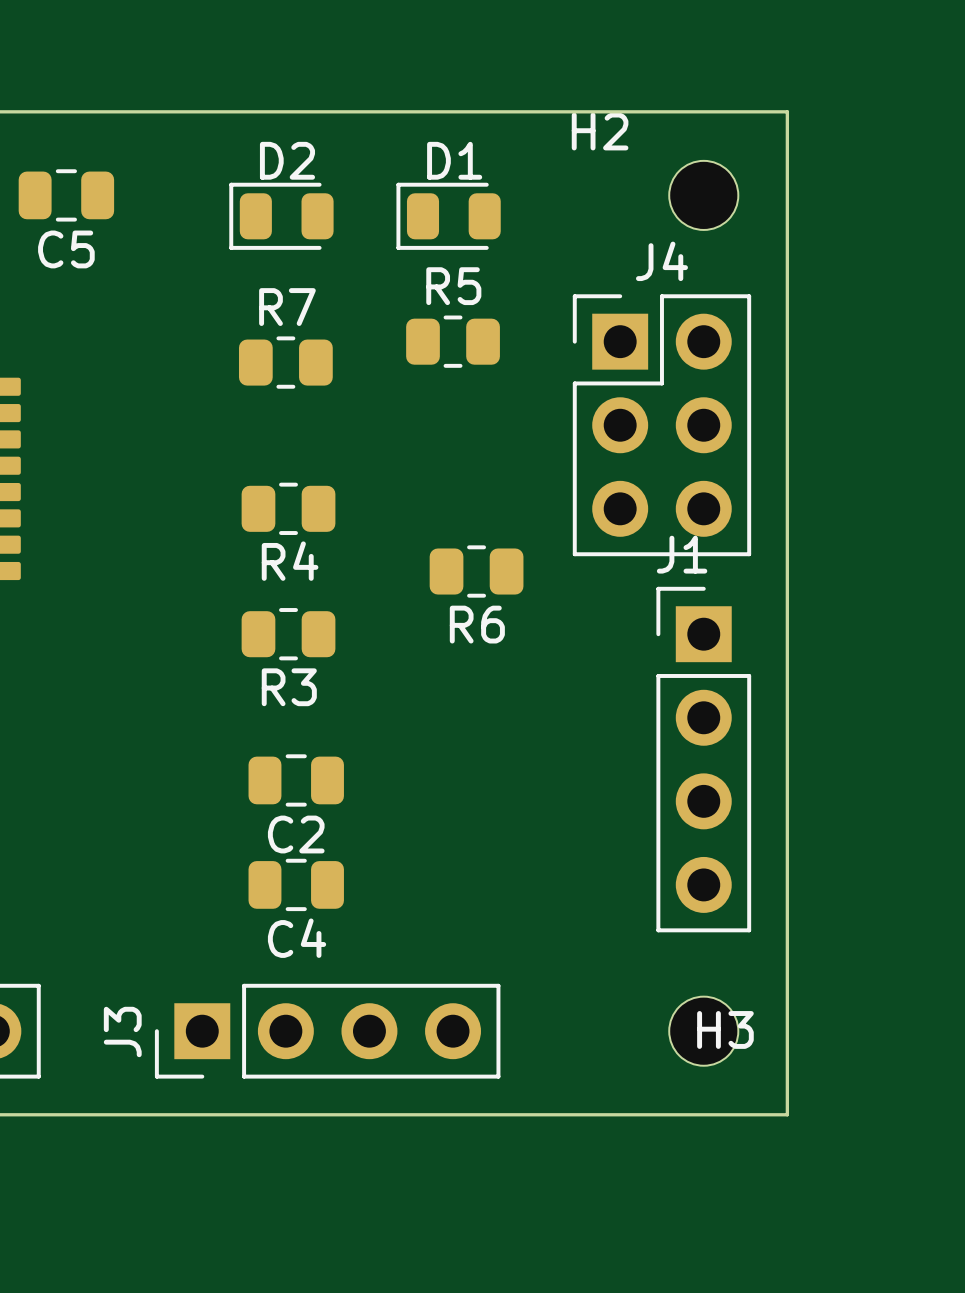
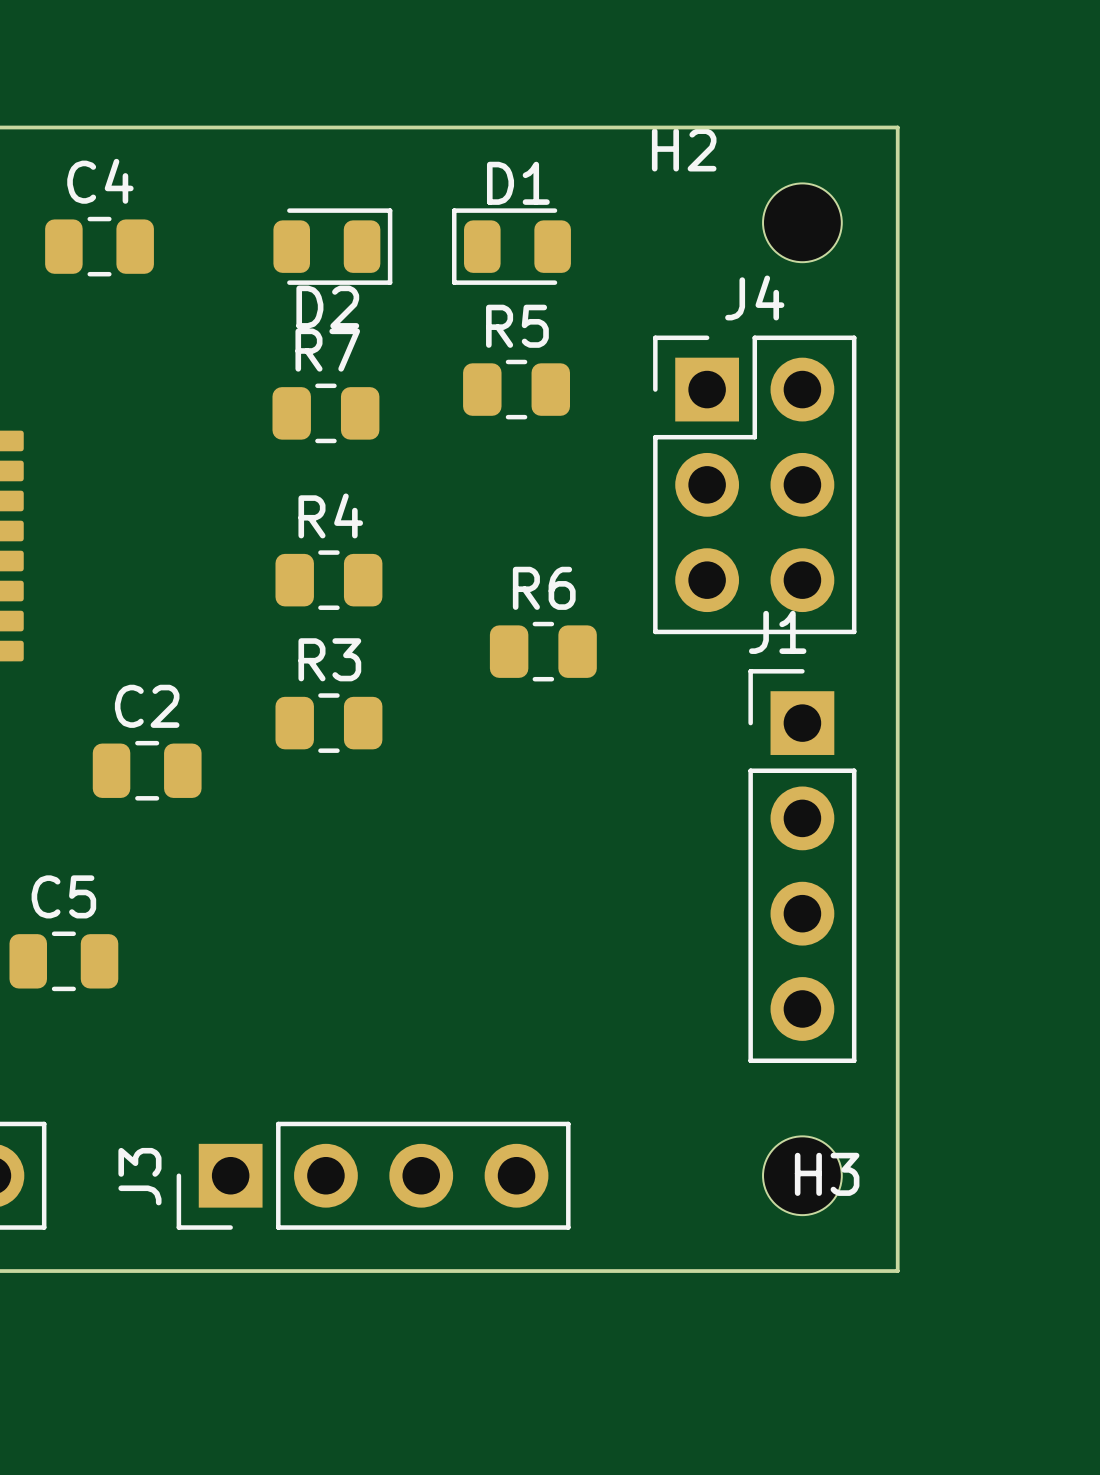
C5 position: (66, 195) -> (63, 961)
D2 rotation: 0° (281, 216) -> 180° (332, 246)
C5 name position: C5 (66, 249) -> C5 (63, 896)
R4 name position: R4 (290, 561) -> R4 (330, 515)
R6 name position: R6 (477, 624) -> R6 (544, 588)
R3 name position: R3 (289, 687) -> R3 (329, 659)
C2 position: (296, 780) -> (147, 770)
C2 name position: C2 (296, 834) -> C2 (147, 706)
C4 position: (296, 884) -> (99, 246)
C4 name position: C4 (297, 938) -> C4 (100, 181)

